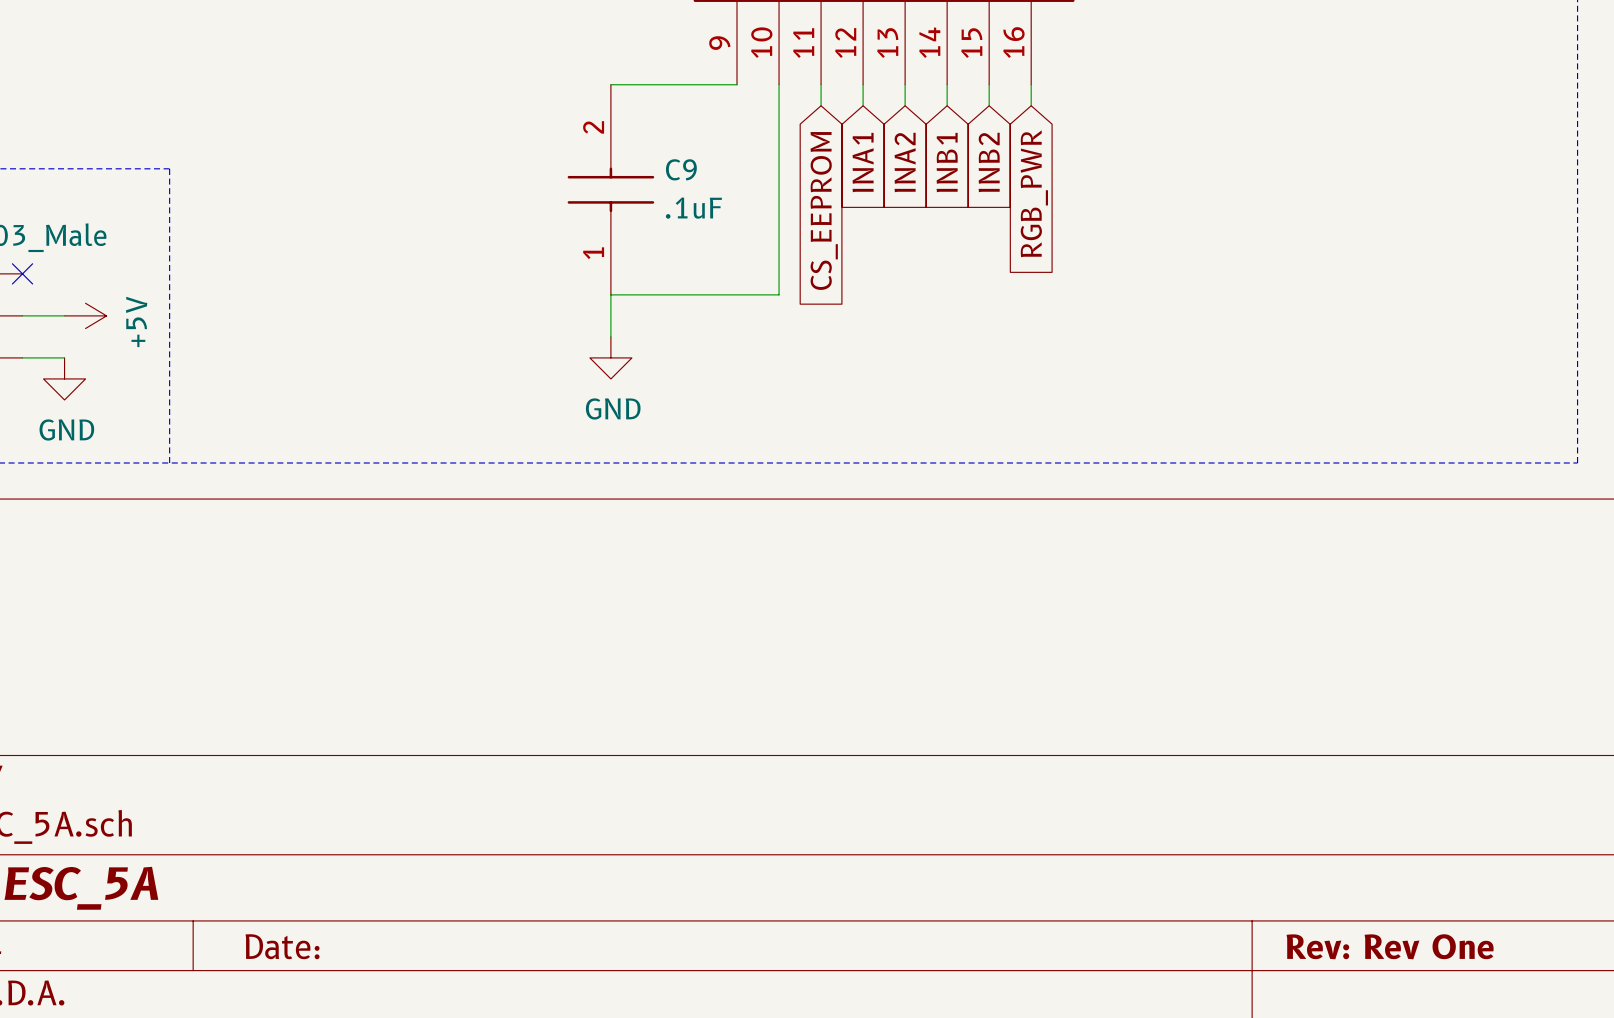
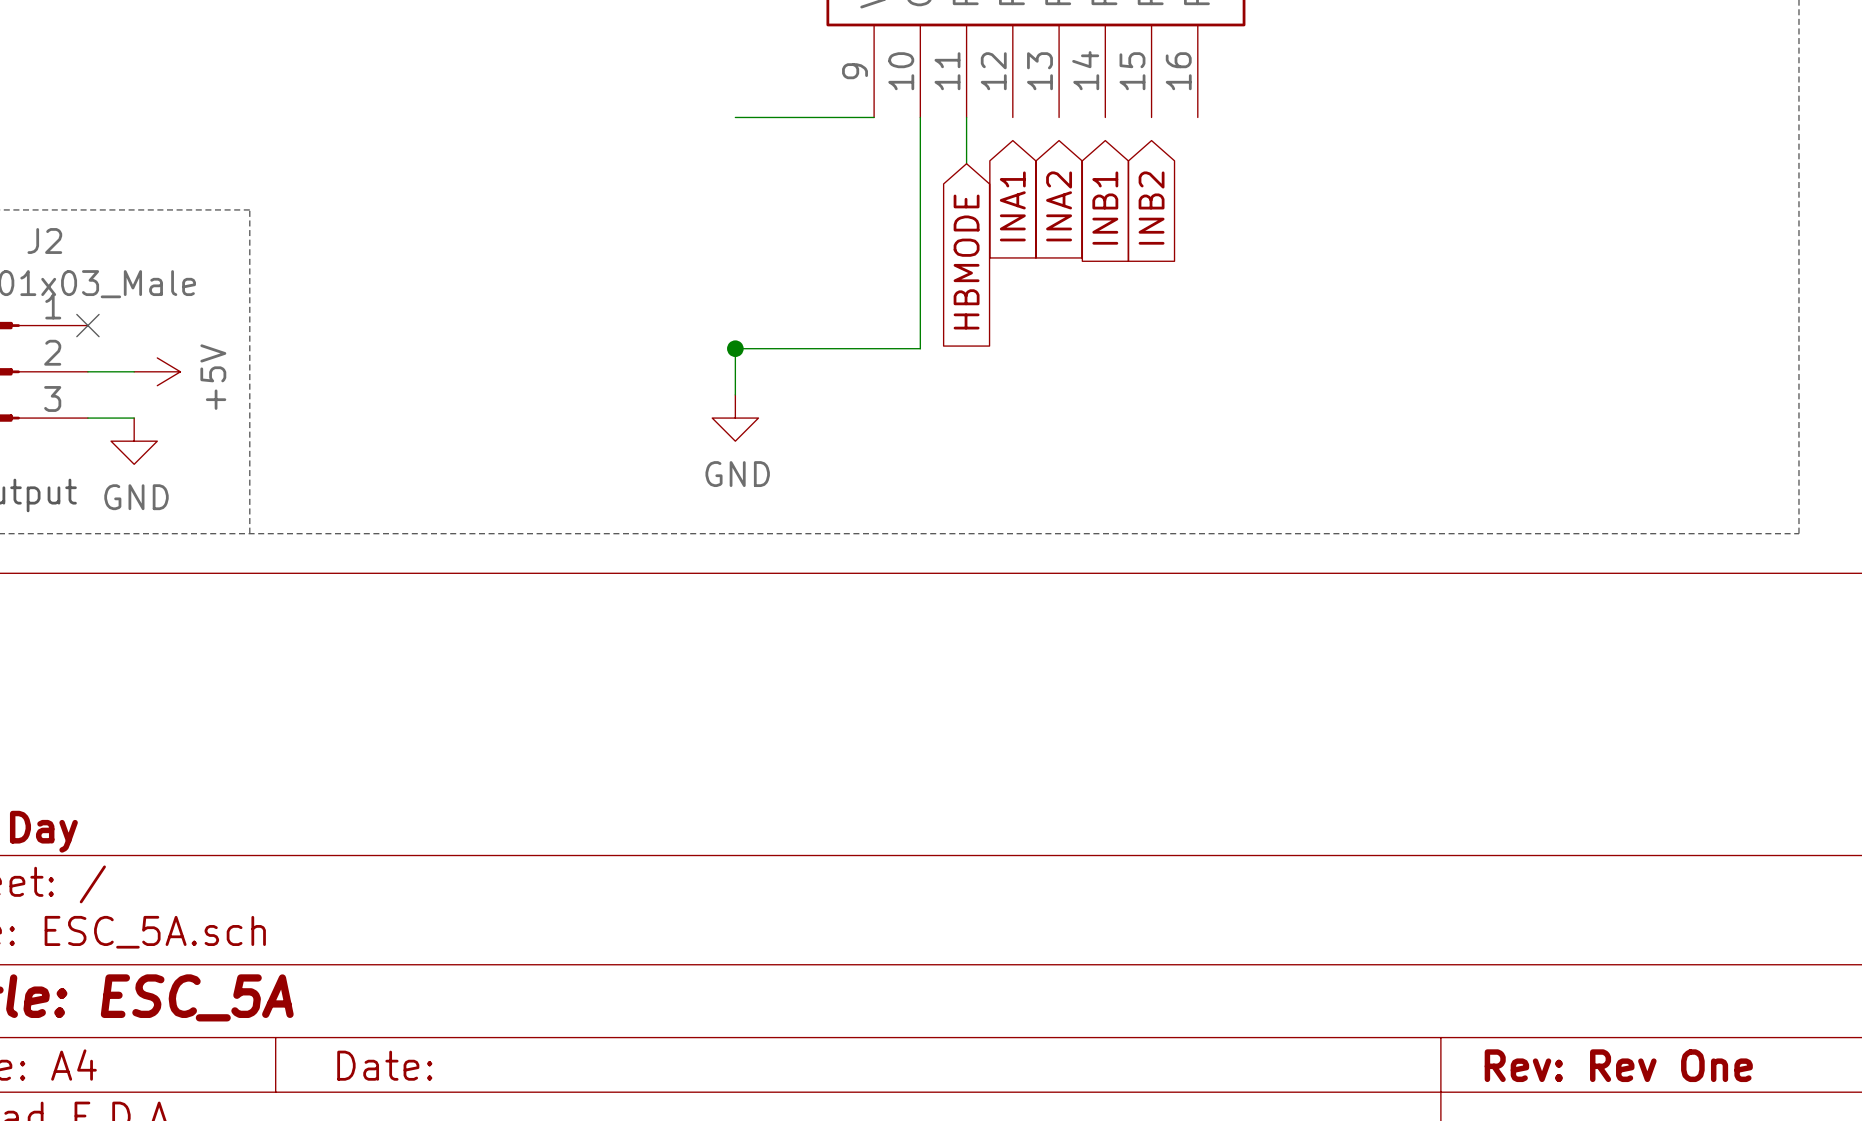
wire: (863, 84) (863, 105) -> (966, 140) (966, 163)
wire: (905, 84) (905, 105) -> none
wire: (947, 84) (947, 105) -> none
wire: (989, 84) (989, 105) -> none
wire: (1031, 84) (1031, 105) -> none
C9: .1uF (610, 189) -> none
global label: RGB_PWR (1034, 193) -> none
global label: none -> HBMODE (966, 262)
global label: CS_EEPROM (824, 210) -> none
junction: none -> (735, 348)

